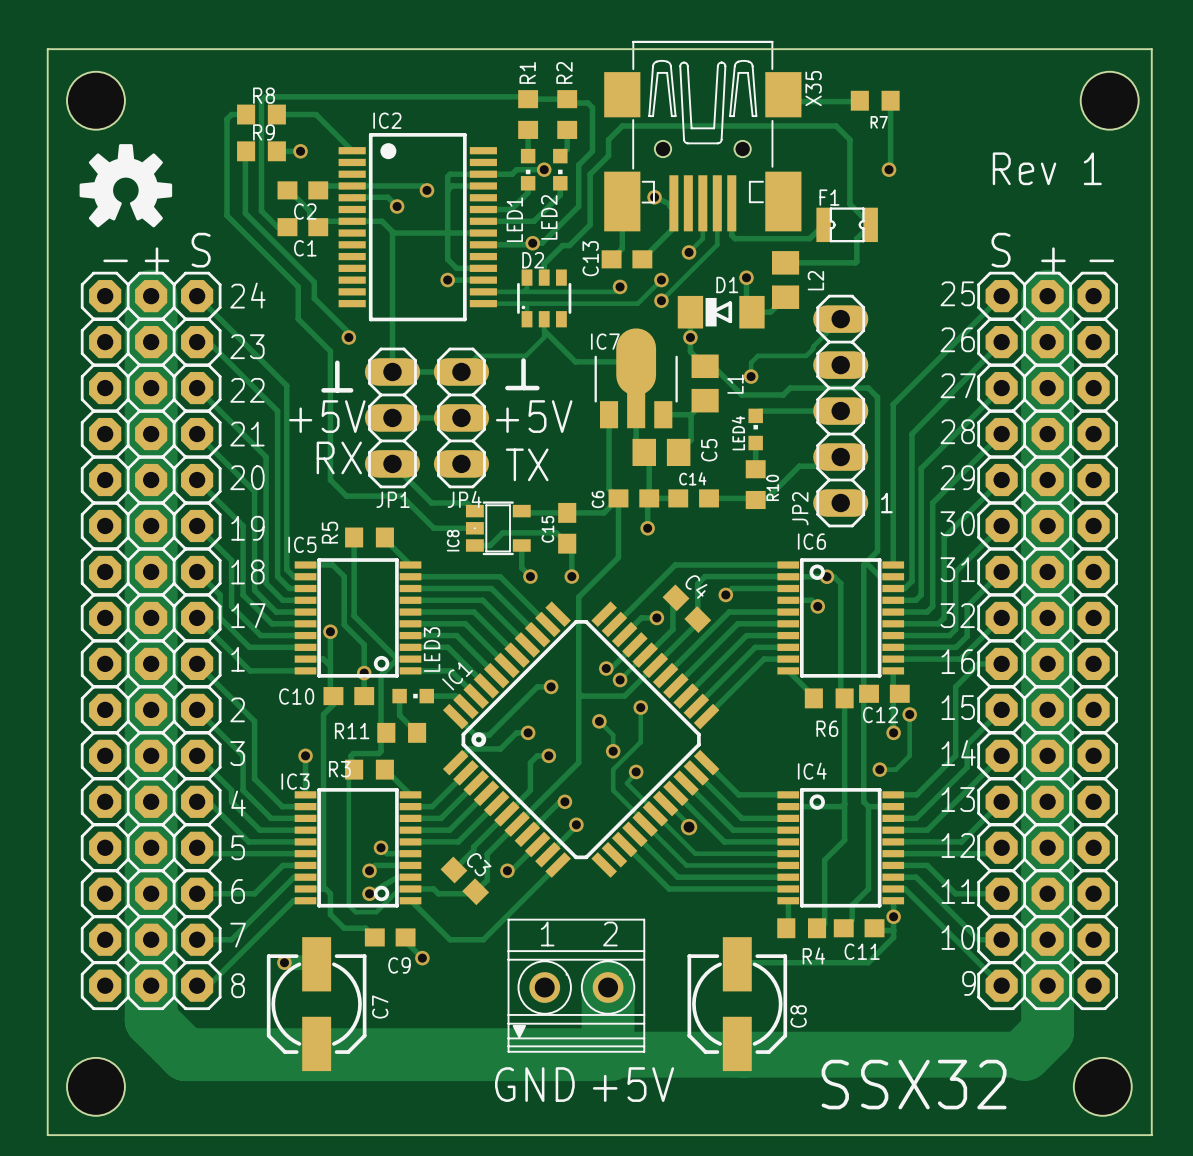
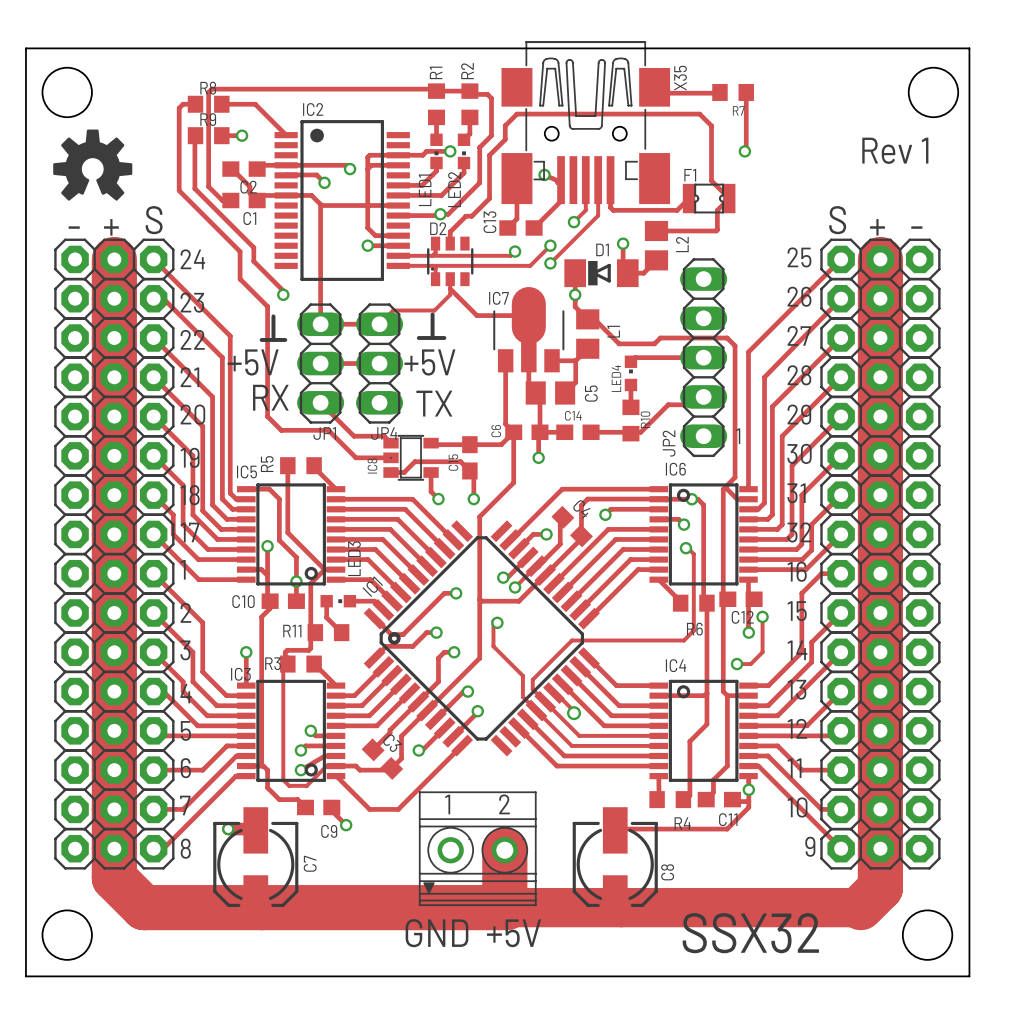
track: (840, 319) (806, 355) (757, 355) (751, 362) (751, 376) -> none
via: (751, 376) -> none
via: none -> (685, 548)
track: (640, 707) (640, 742) (613, 769) (613, 790) (645, 824) -> (493, 620) (493, 646) (522, 675) (522, 697) (536, 710)
via: (640, 707) -> none
track: (599, 721) (613, 735) (613, 751) -> none
via: (613, 751) -> none
track: (636, 771) (626, 783) (655, 813) -> (685, 548) (693, 554) (693, 630) (684, 640) (572, 640) (532, 679) (532, 689) (545, 701)
via: (636, 771) -> none

